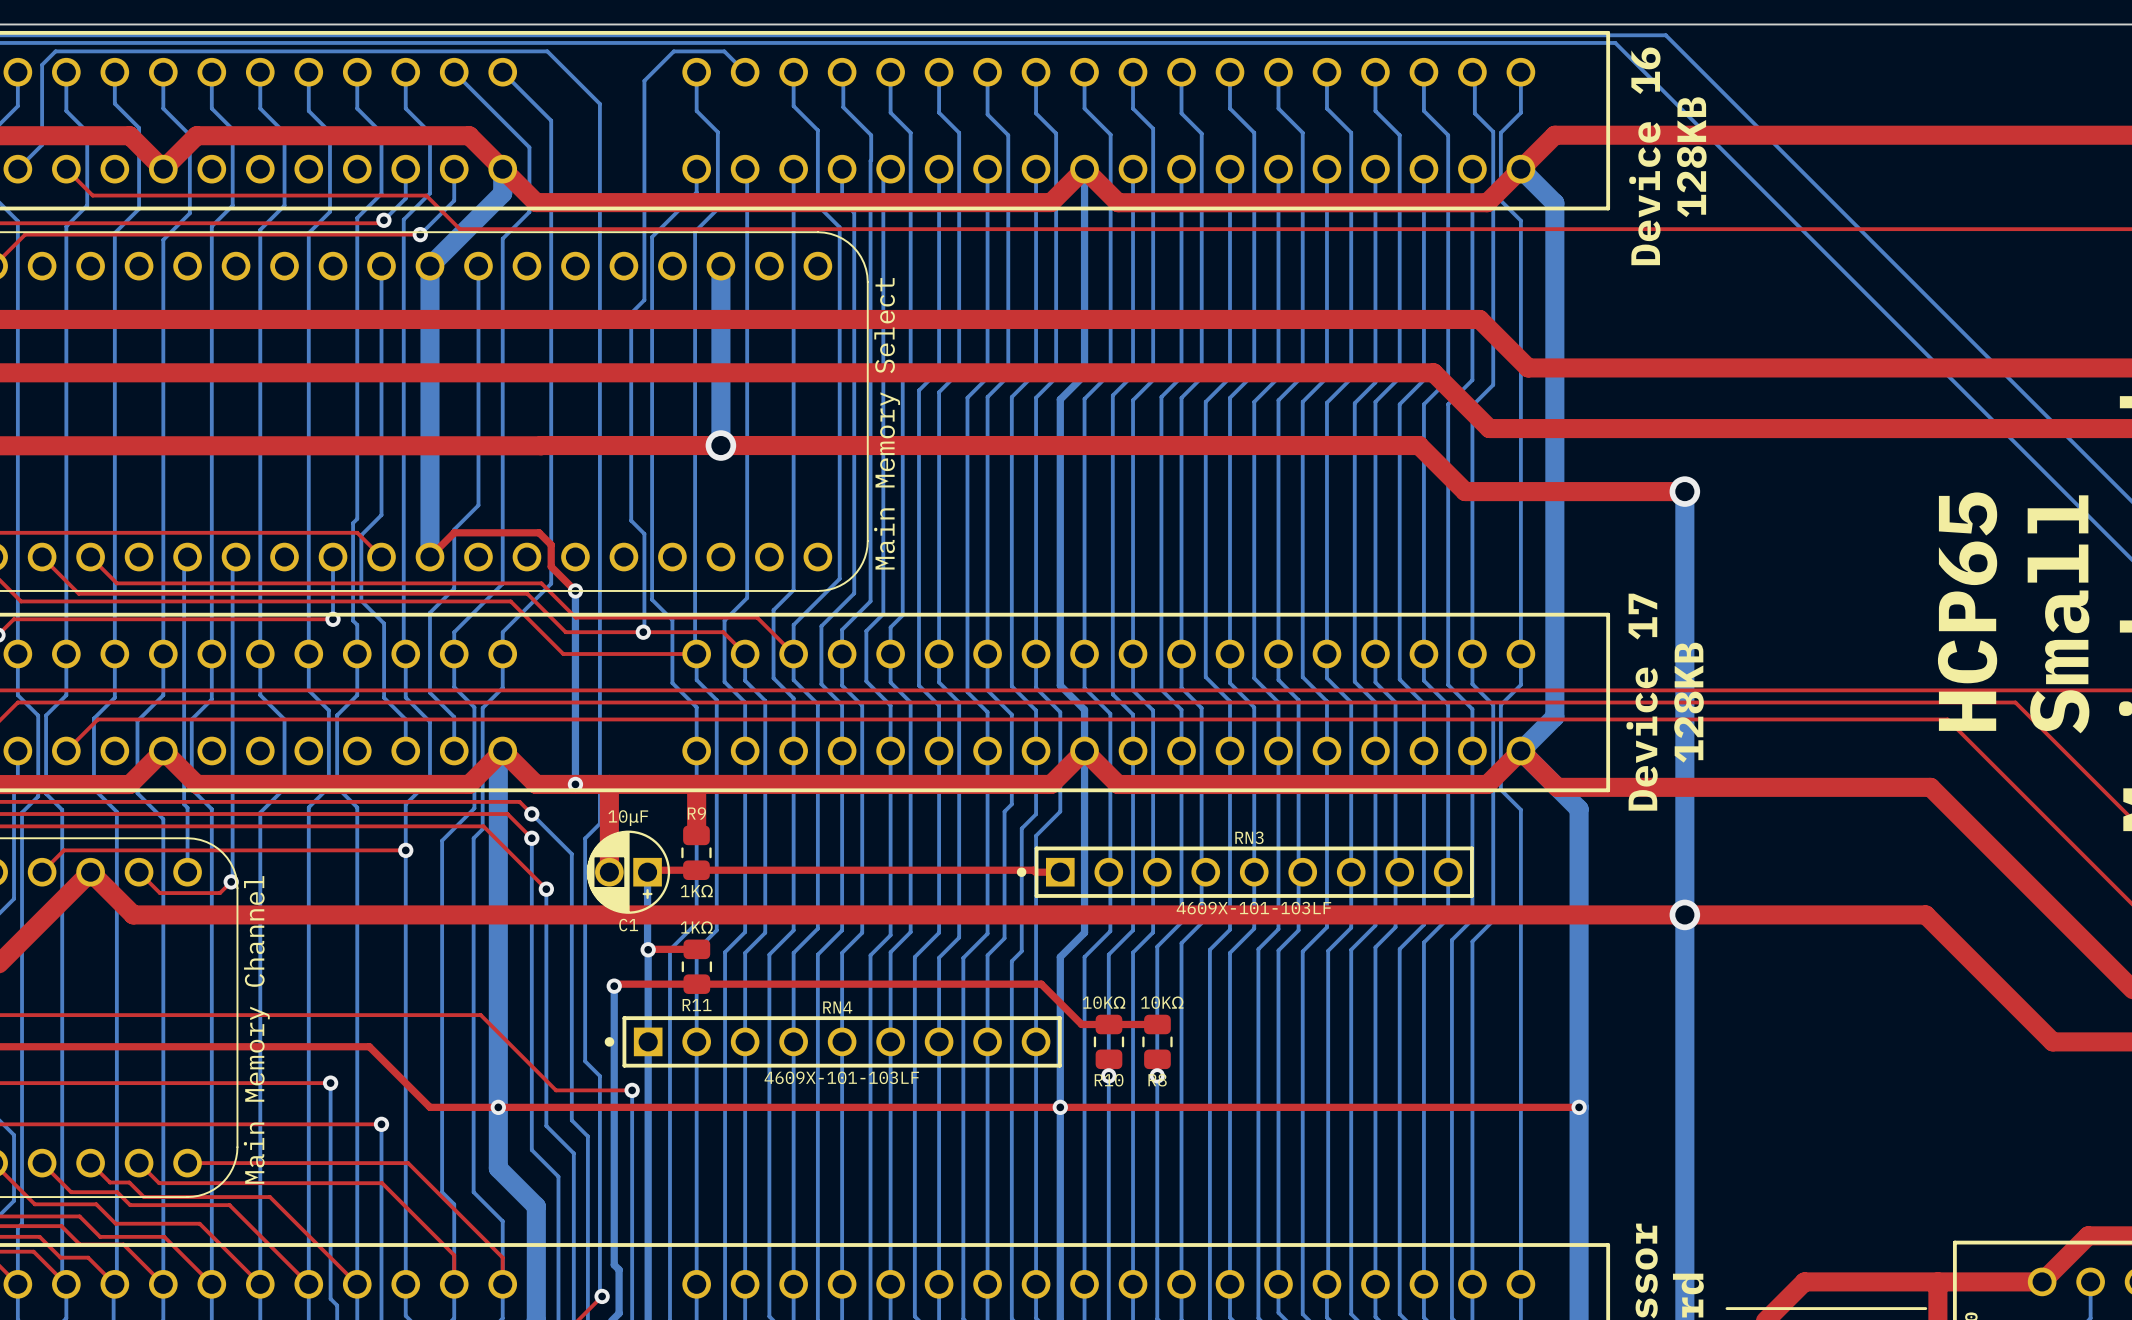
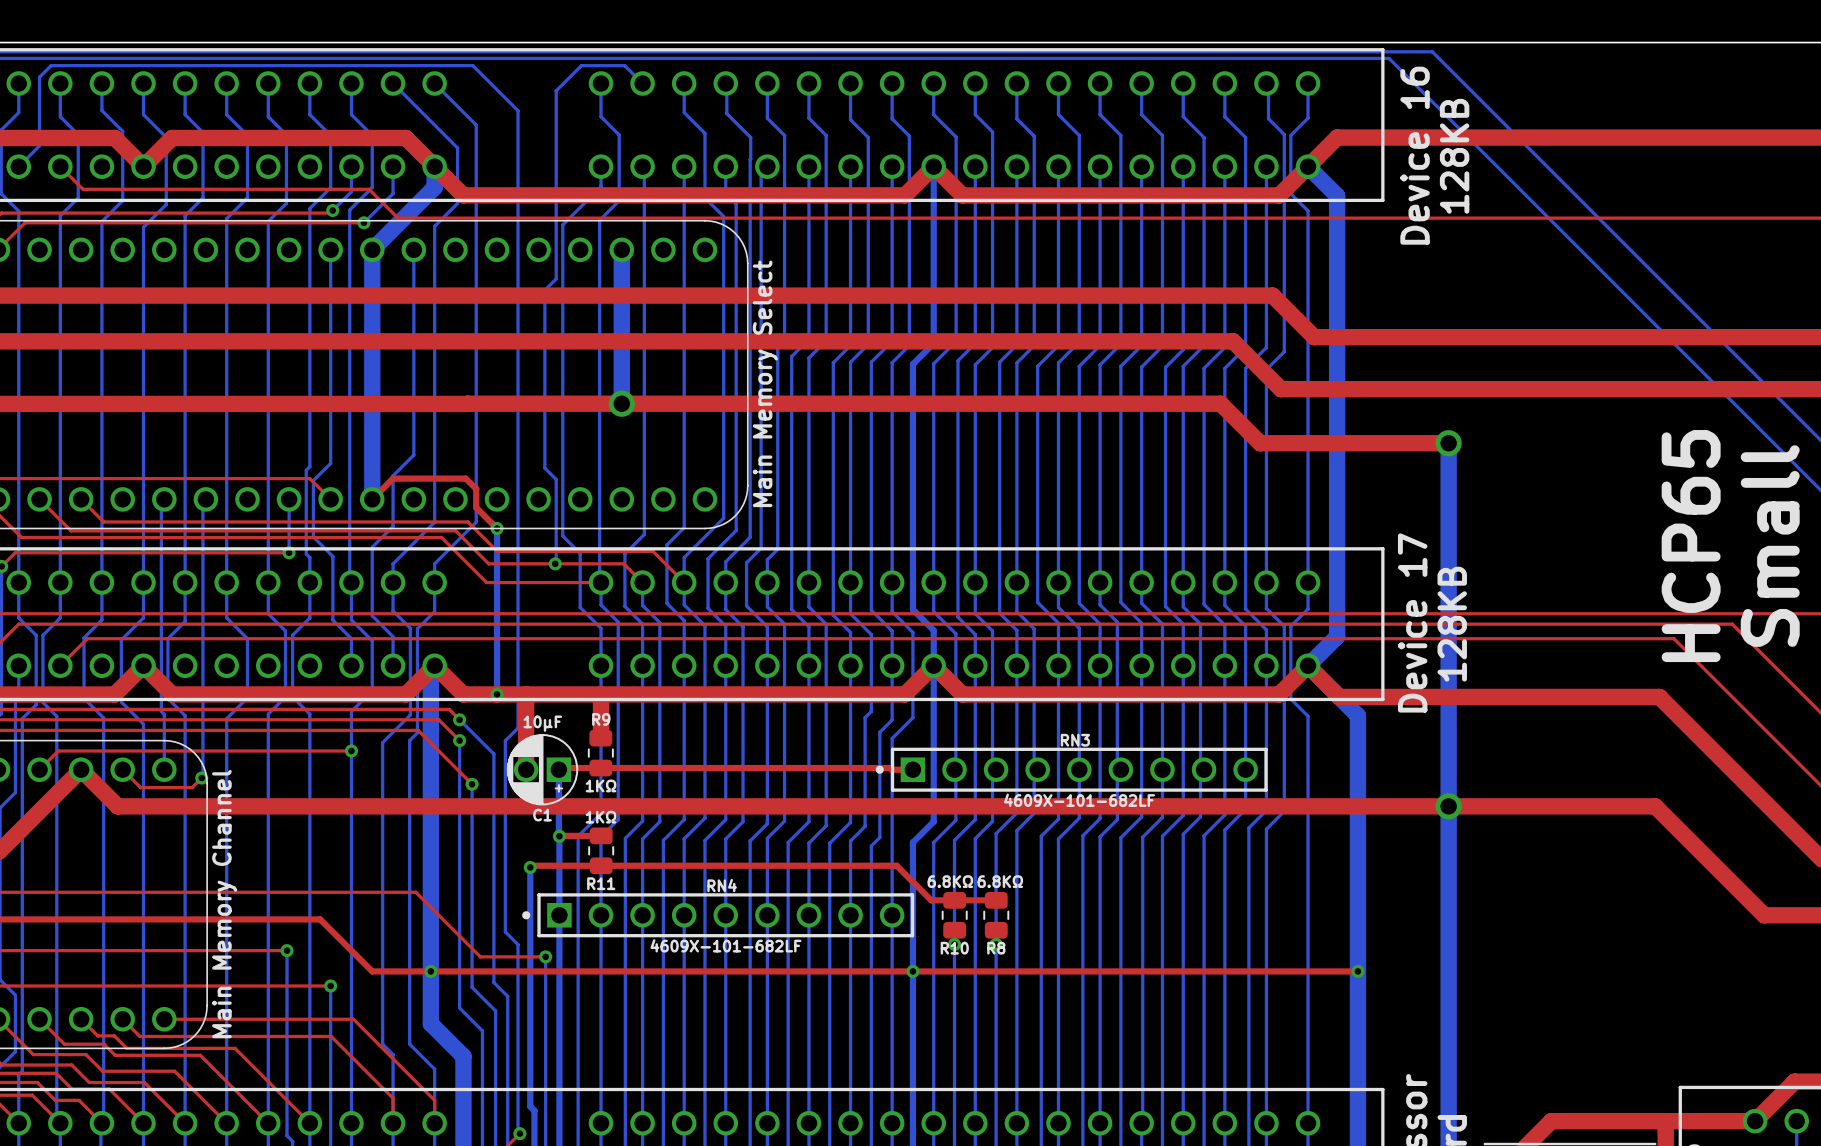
RN3 value: 4609X-101-103LF (1253, 908) -> 4609X-101-682LF (1079, 800)
R10 value: 10KΩ (1104, 1002) -> 6.8KΩ (950, 881)
R8 value: 10KΩ (1162, 1002) -> 6.8KΩ (1000, 881)
RN4 value: 4609X-101-103LF (841, 1077) -> 4609X-101-682LF (726, 945)

